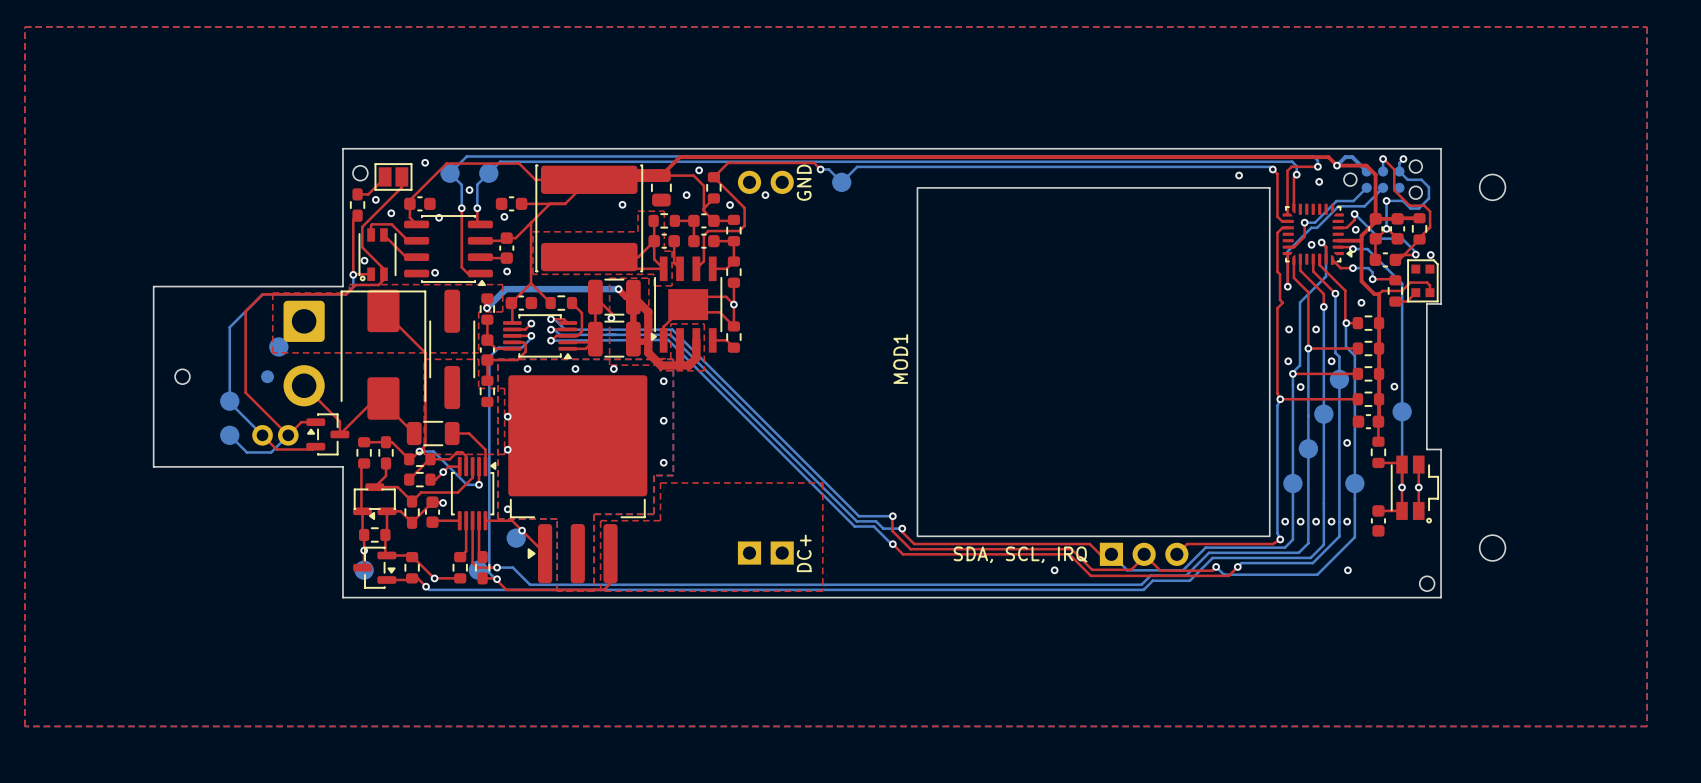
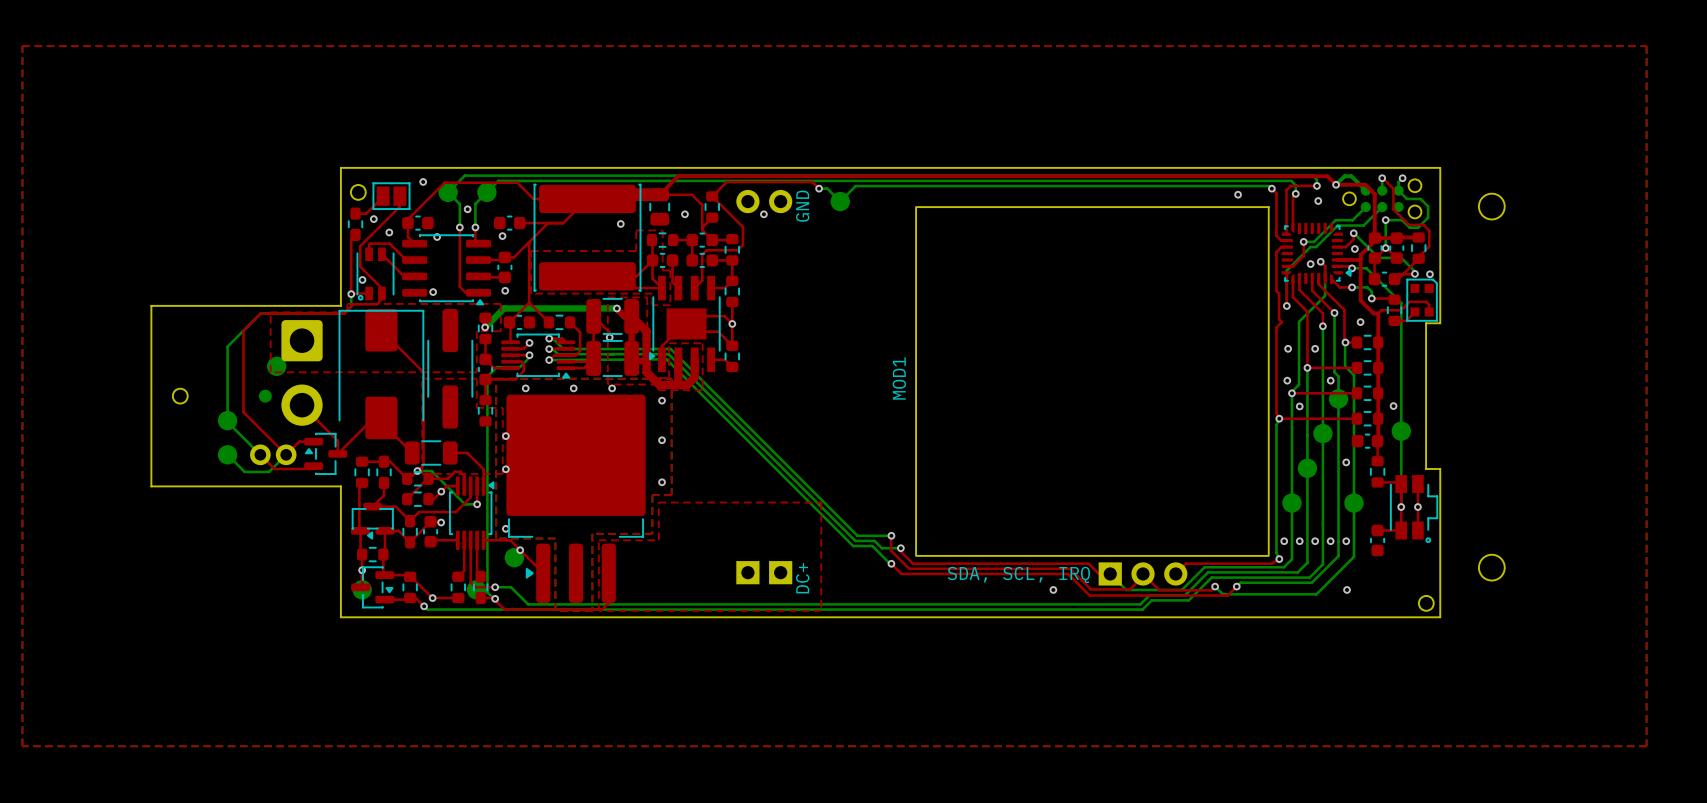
via: (699, 170) -> none
via: (730, 205) -> none

